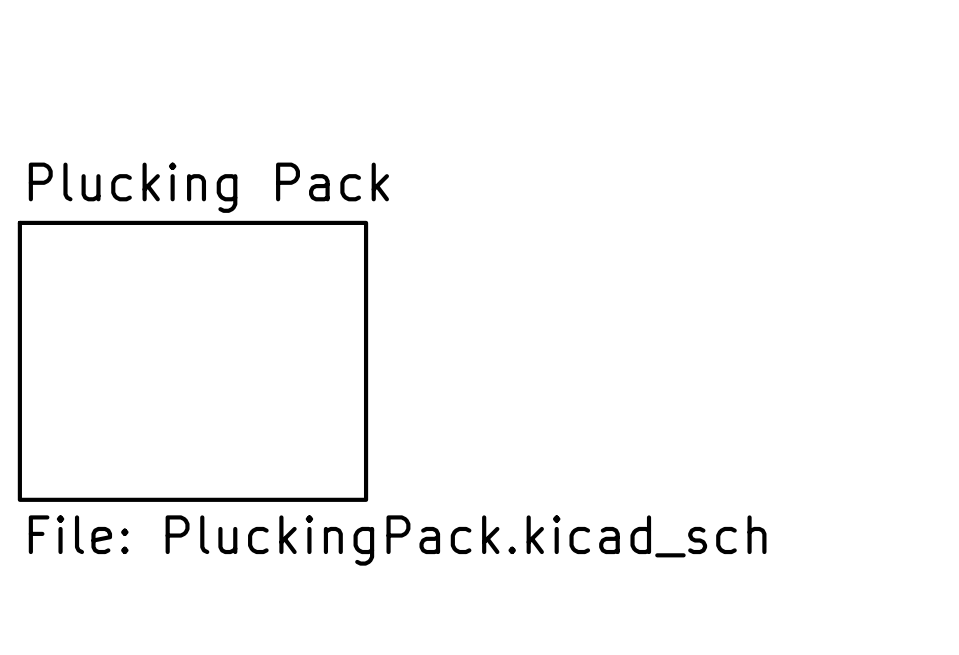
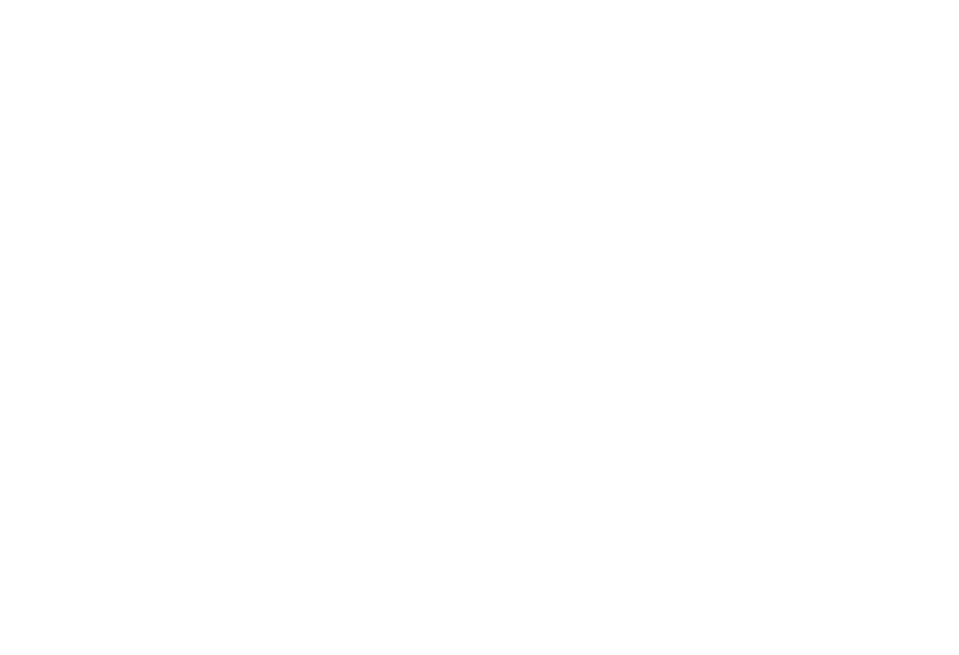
sheet Plucking Pack: File: PluckingPack.kicad_sch (192, 361) -> none

